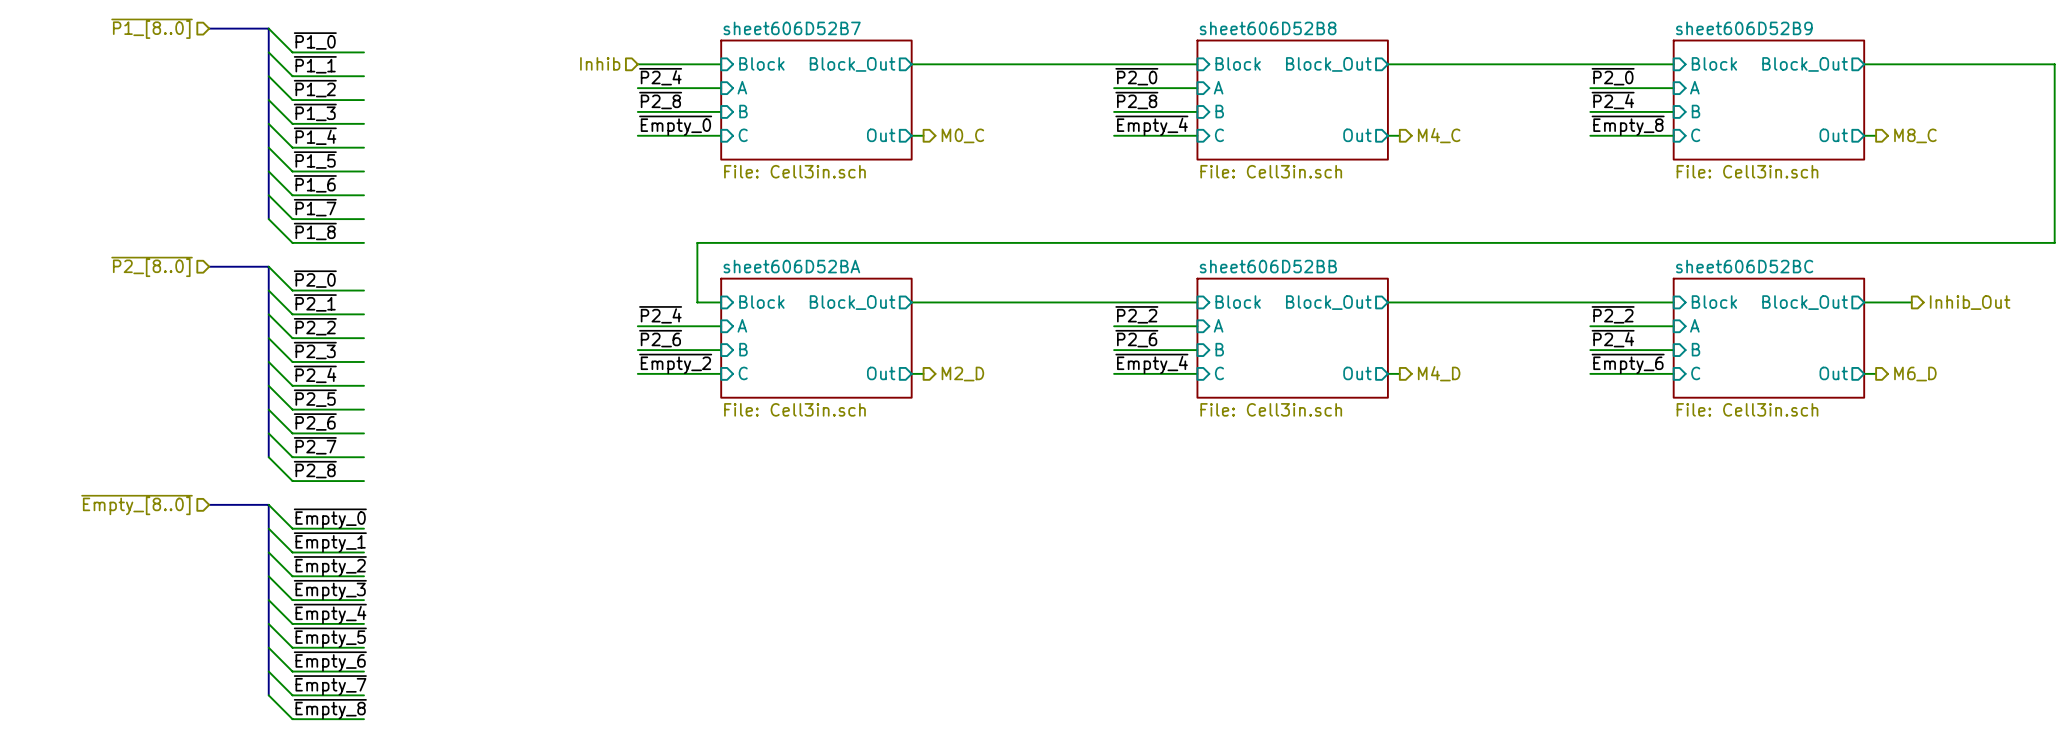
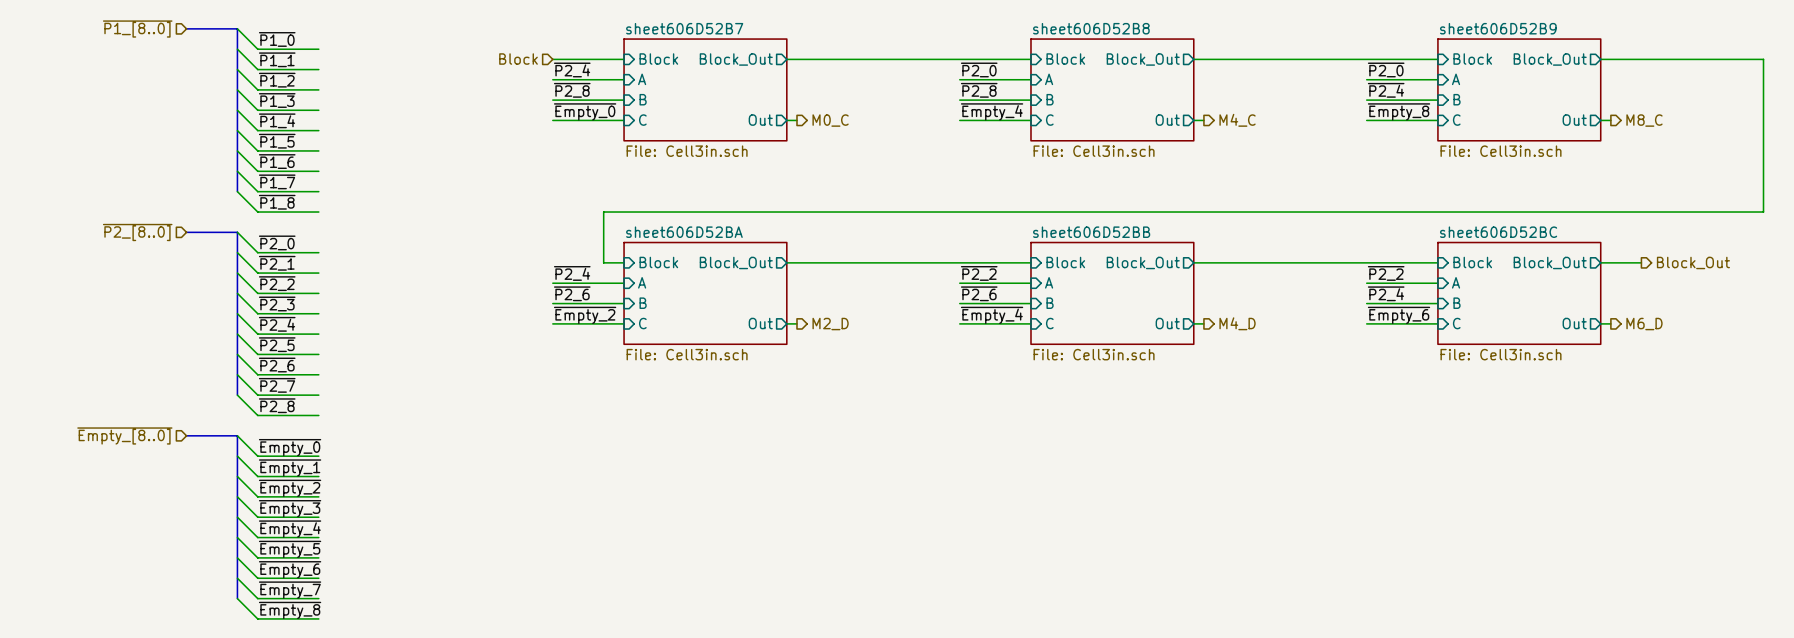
hierarchical label: Inhib (600, 63) -> Block (518, 59)
hierarchical label: Inhib_Out (1970, 302) -> Block_Out (1693, 262)

